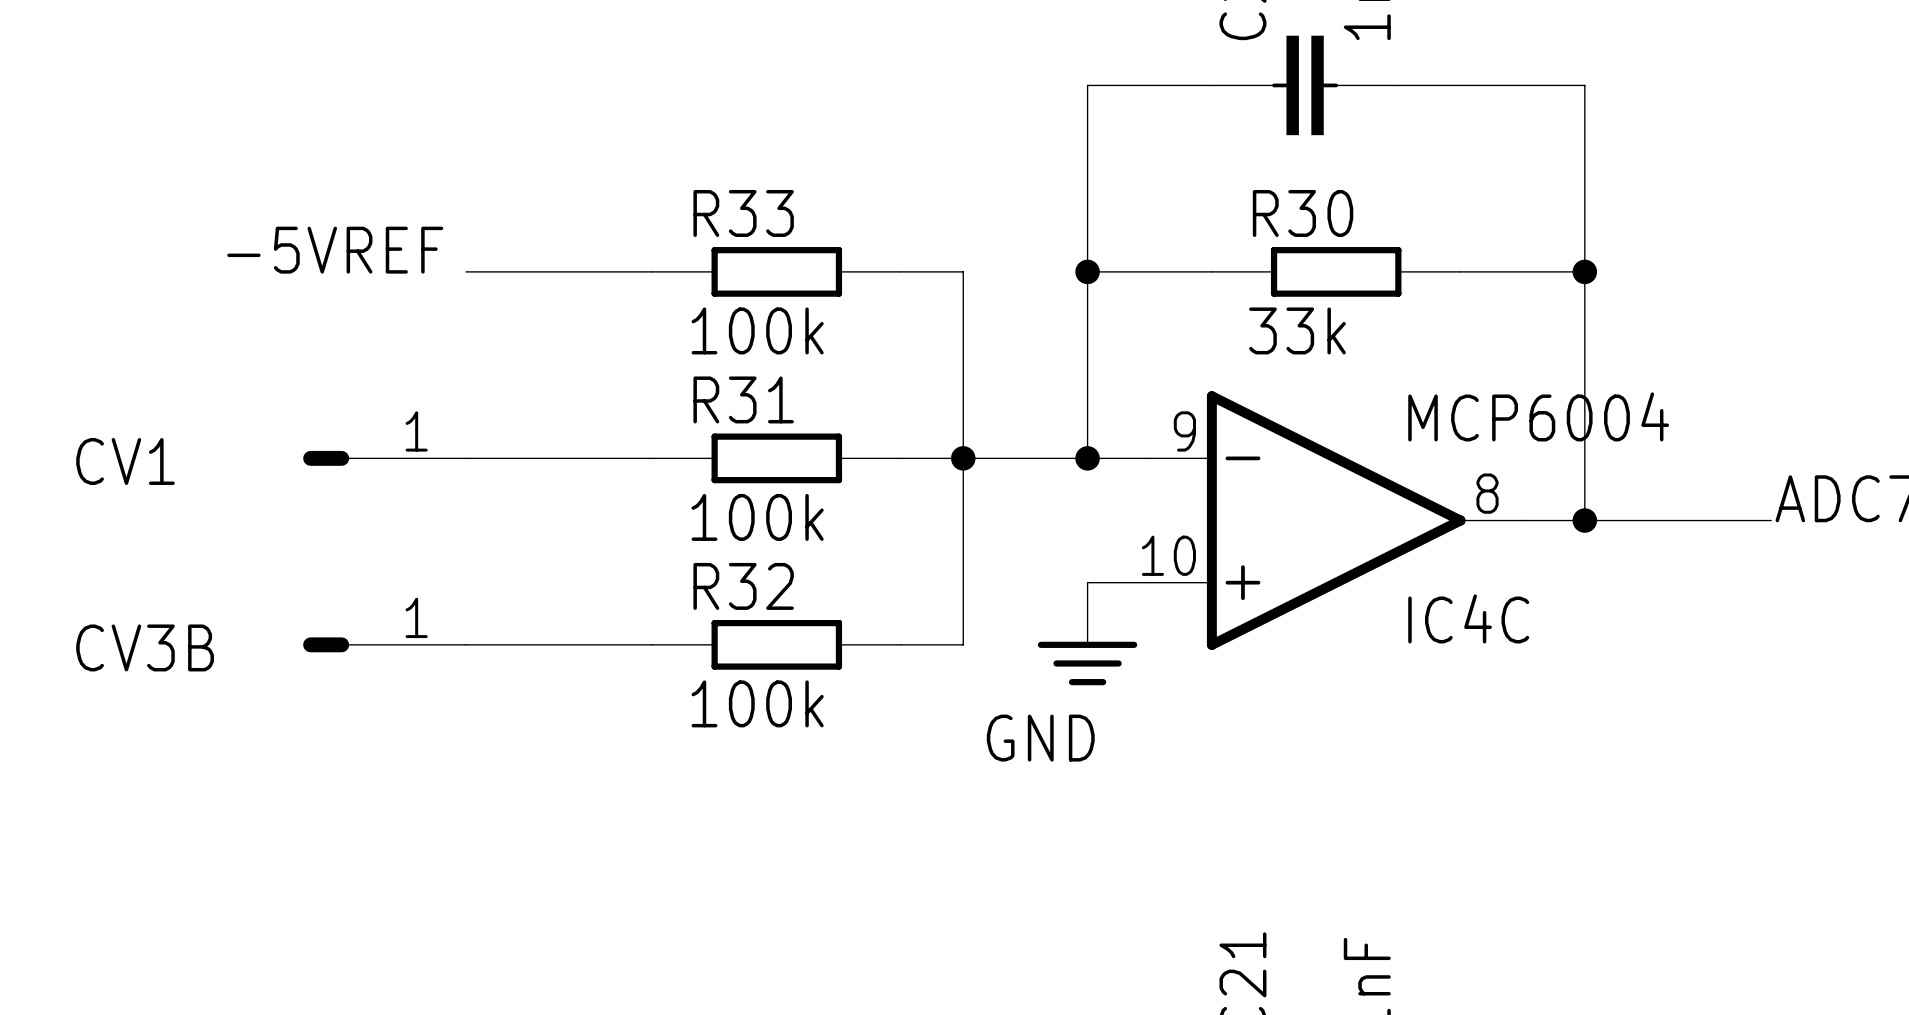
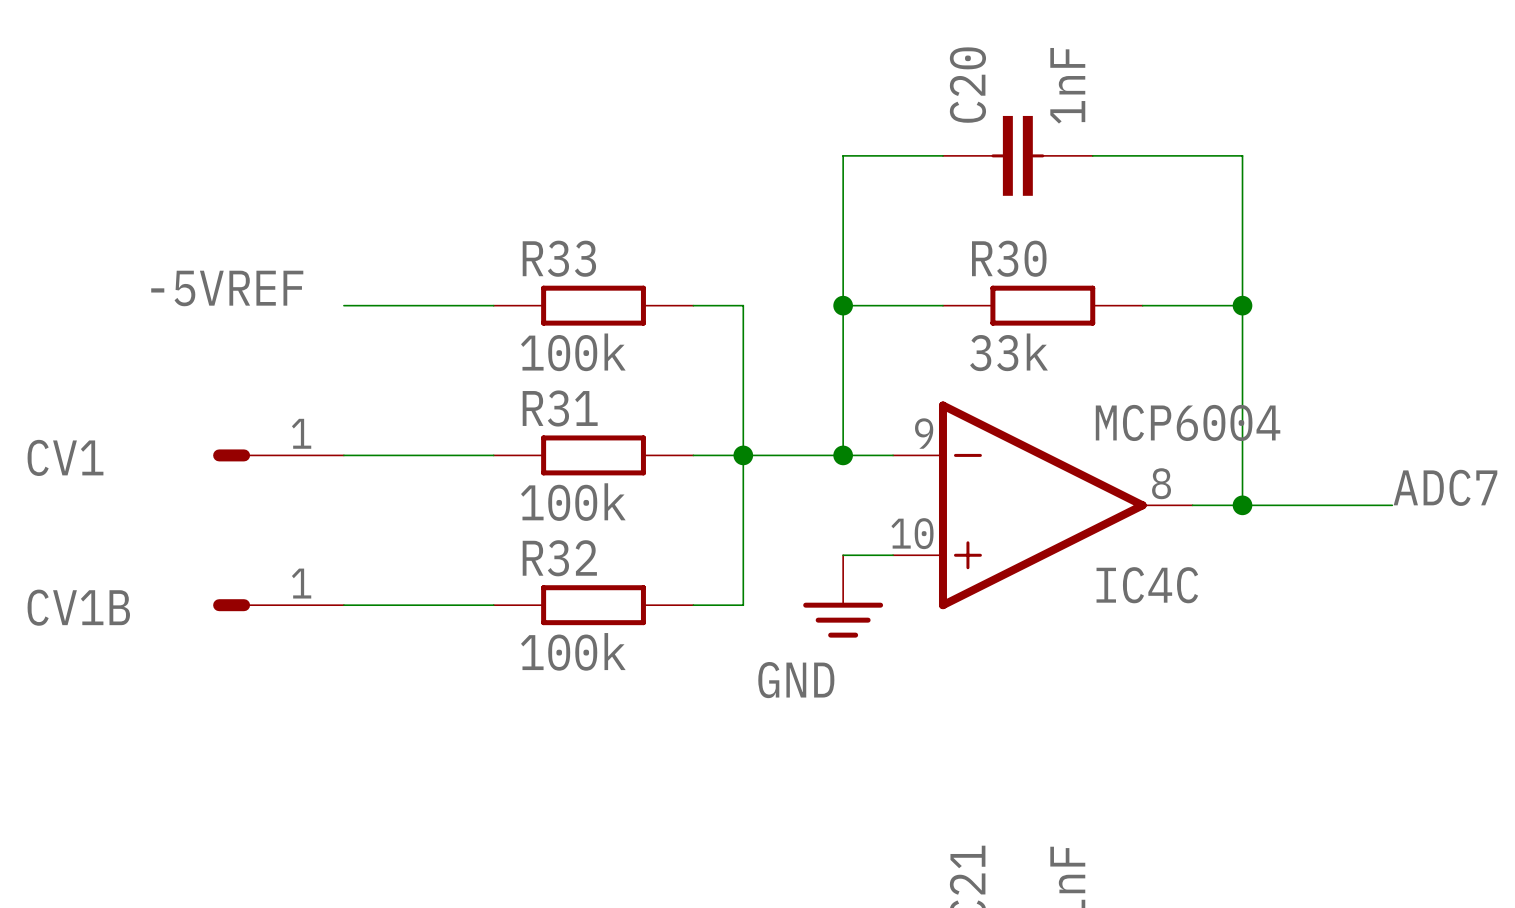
CV3B name: CV3B (145, 647) -> CV1B (78, 607)

